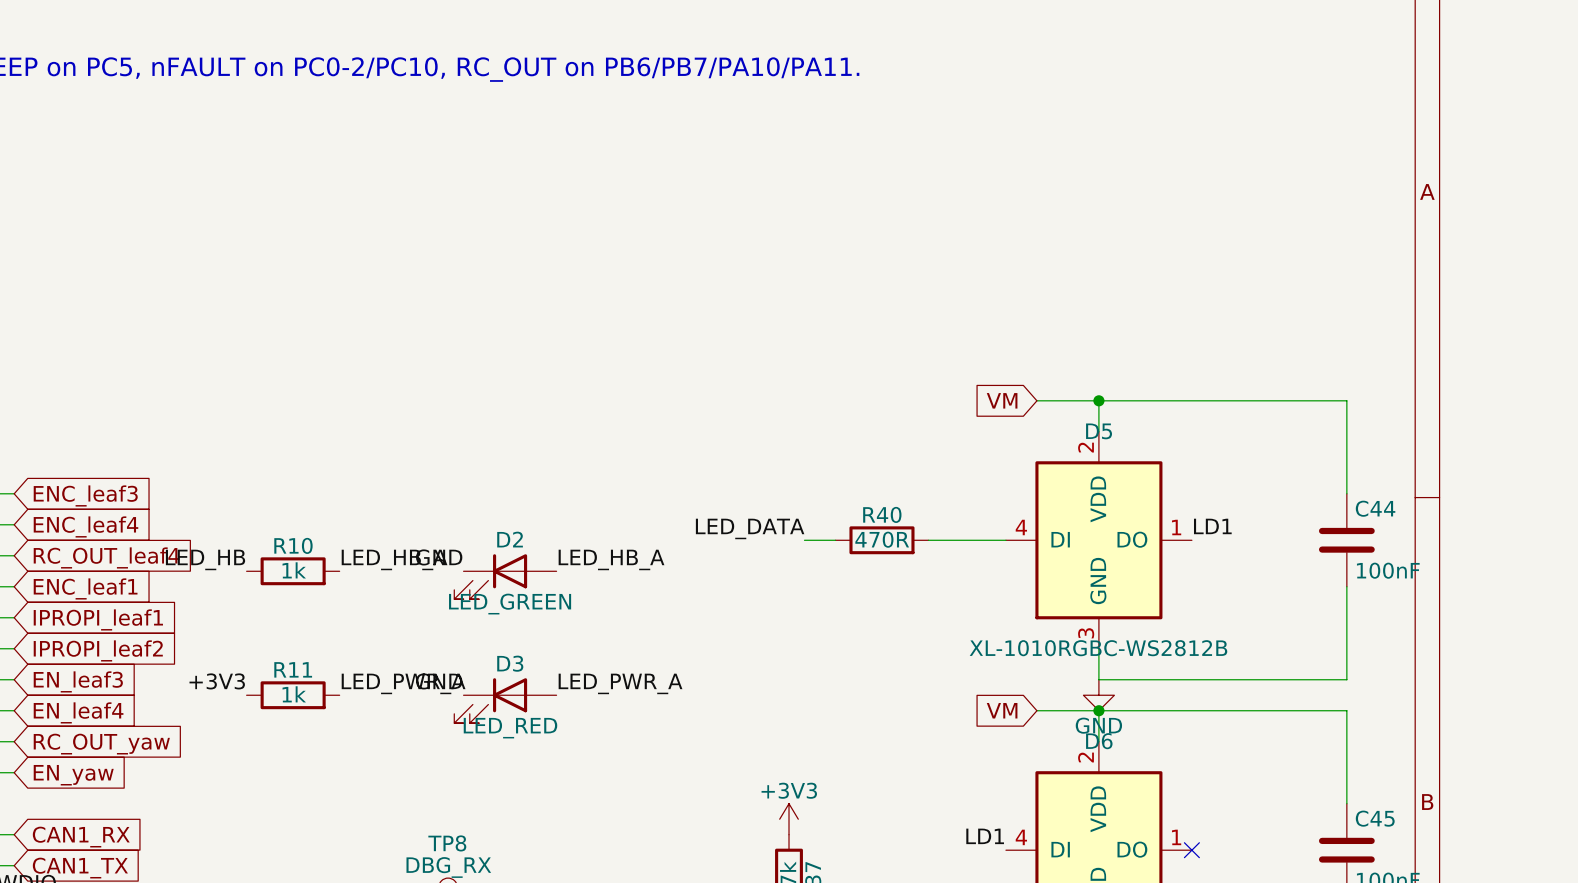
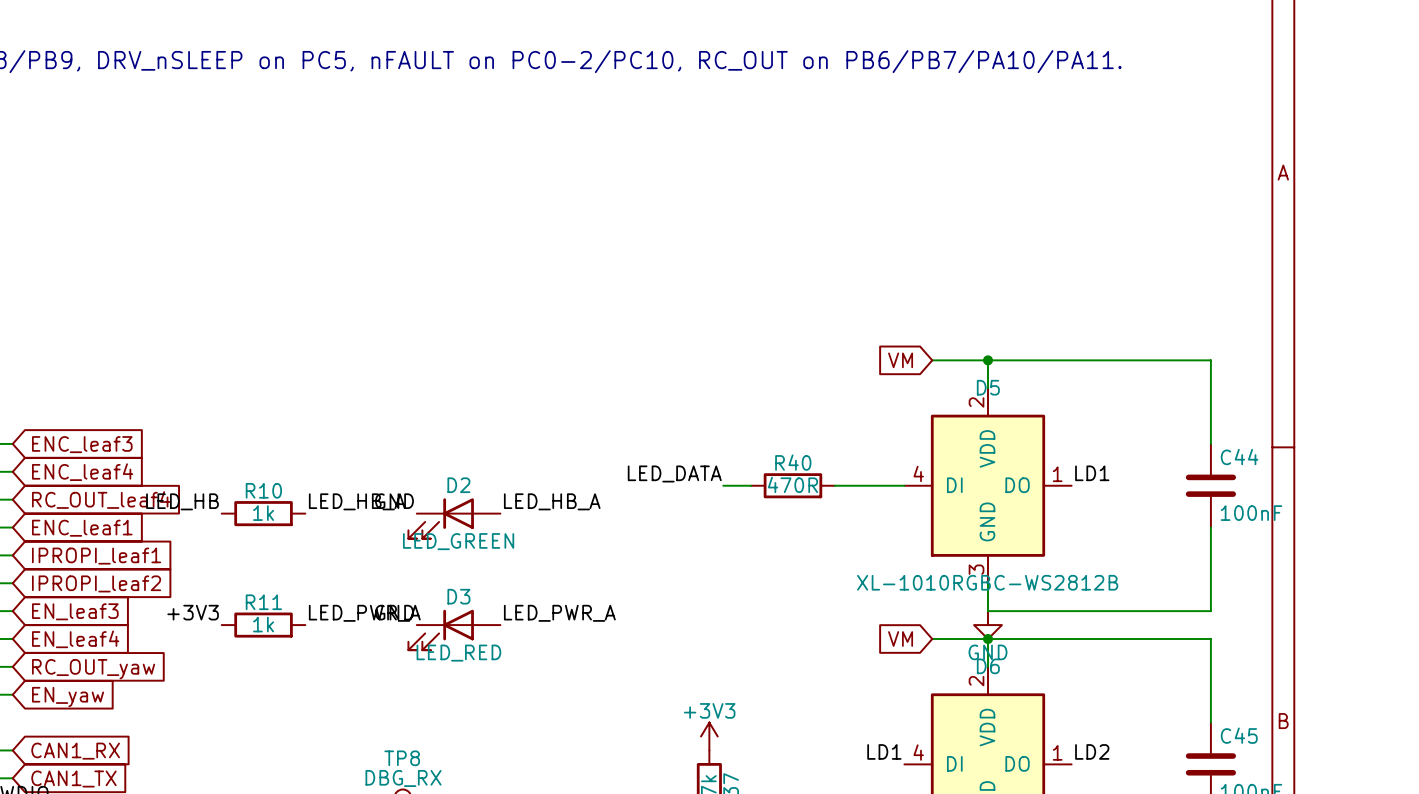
label: none -> LD2 (1092, 751)
no-connect mark: (1191, 850) -> none

